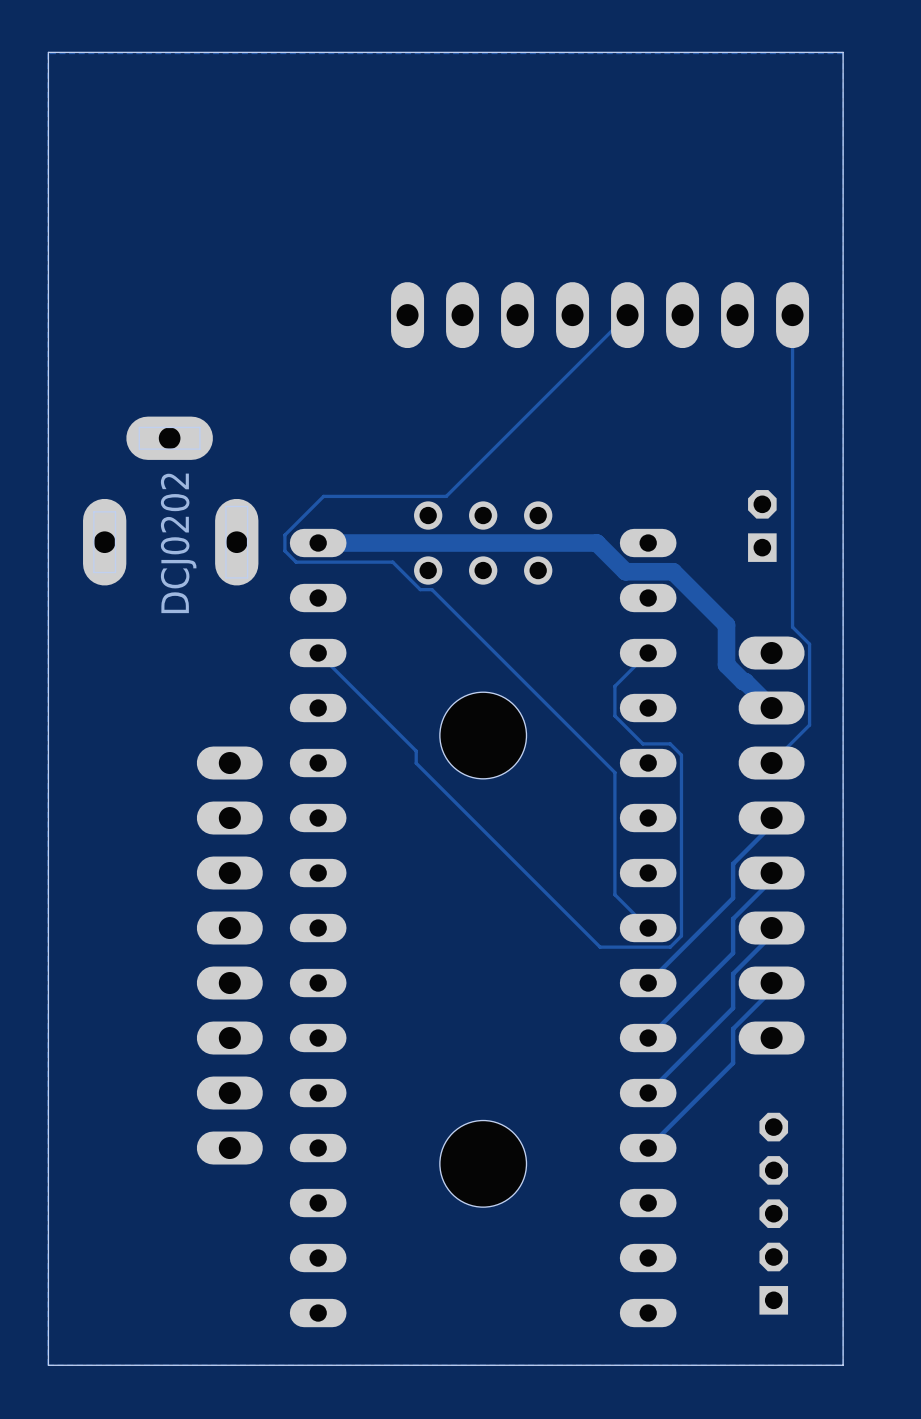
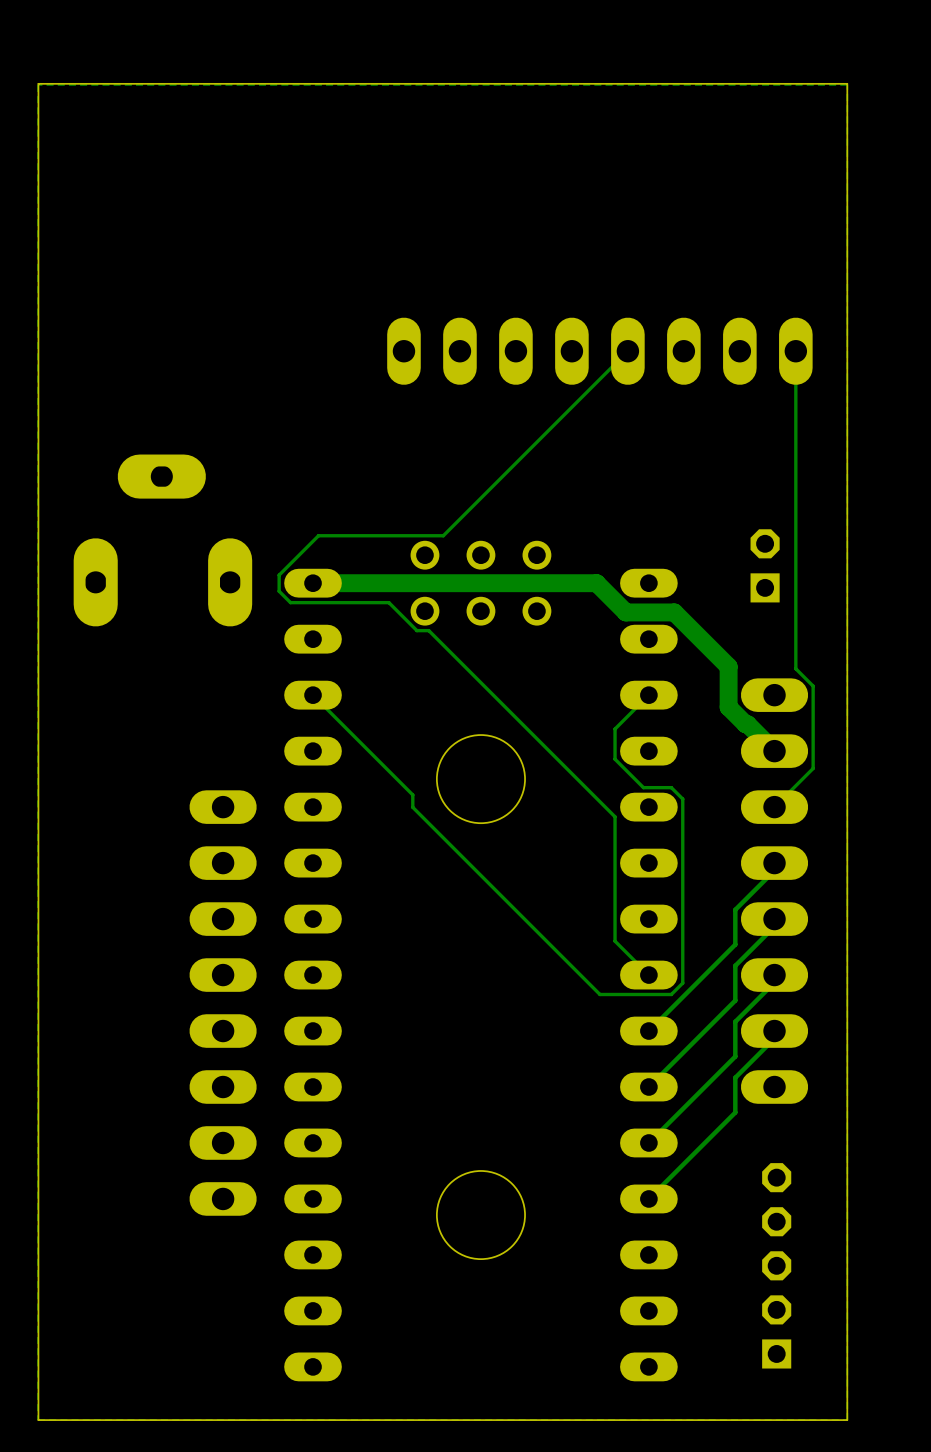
part value: DCJ0202 (178, 543) -> none

